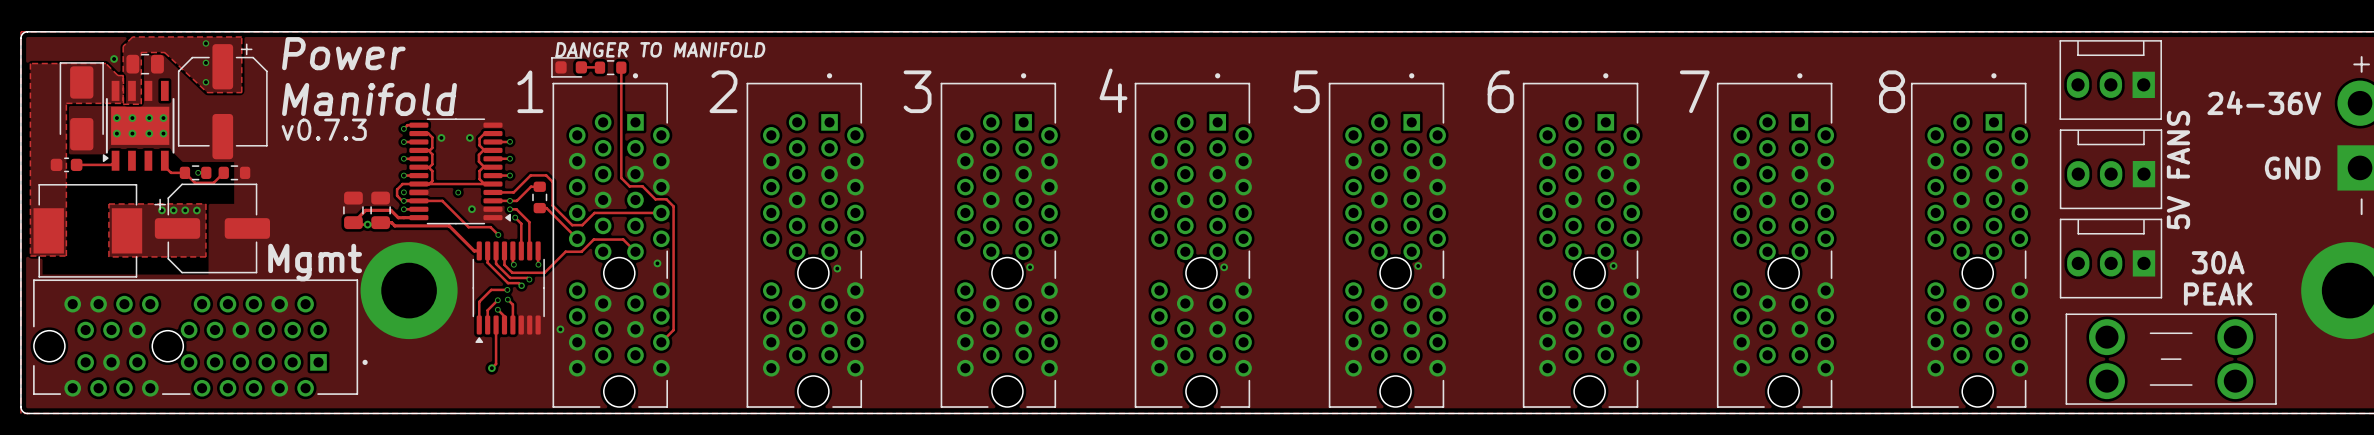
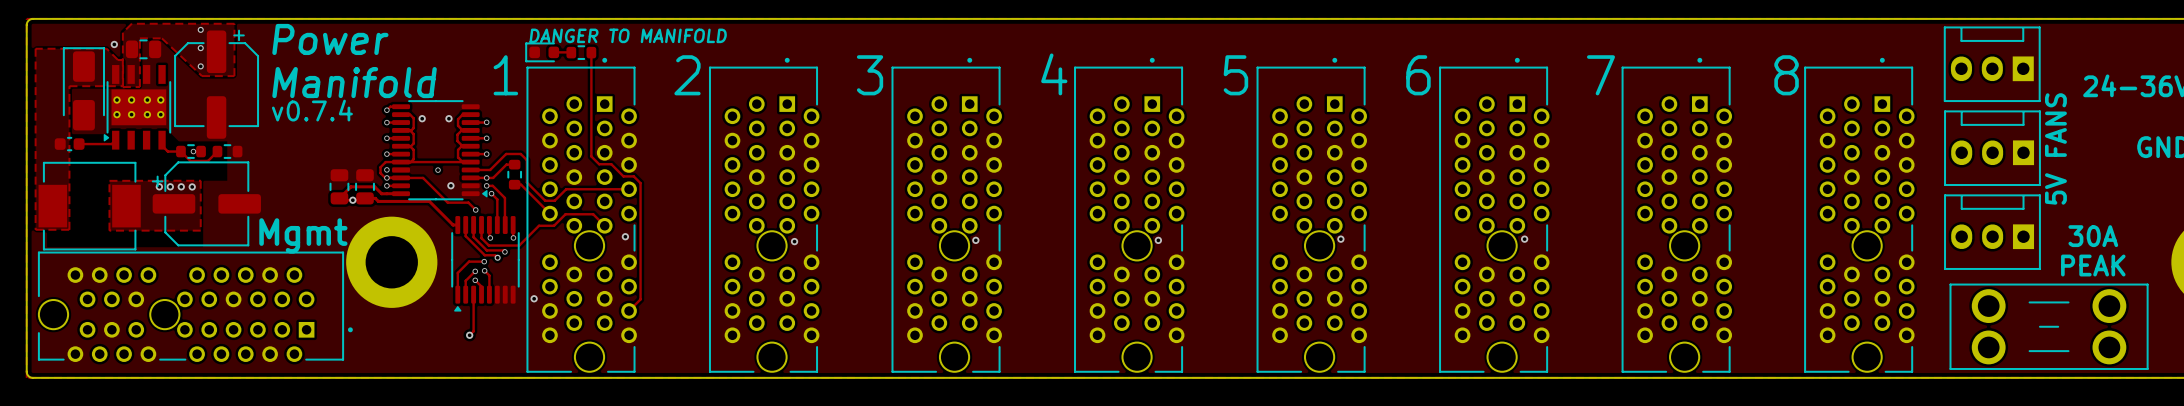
text: v0.7.3 (324, 129) -> v0.7.4 (312, 110)

